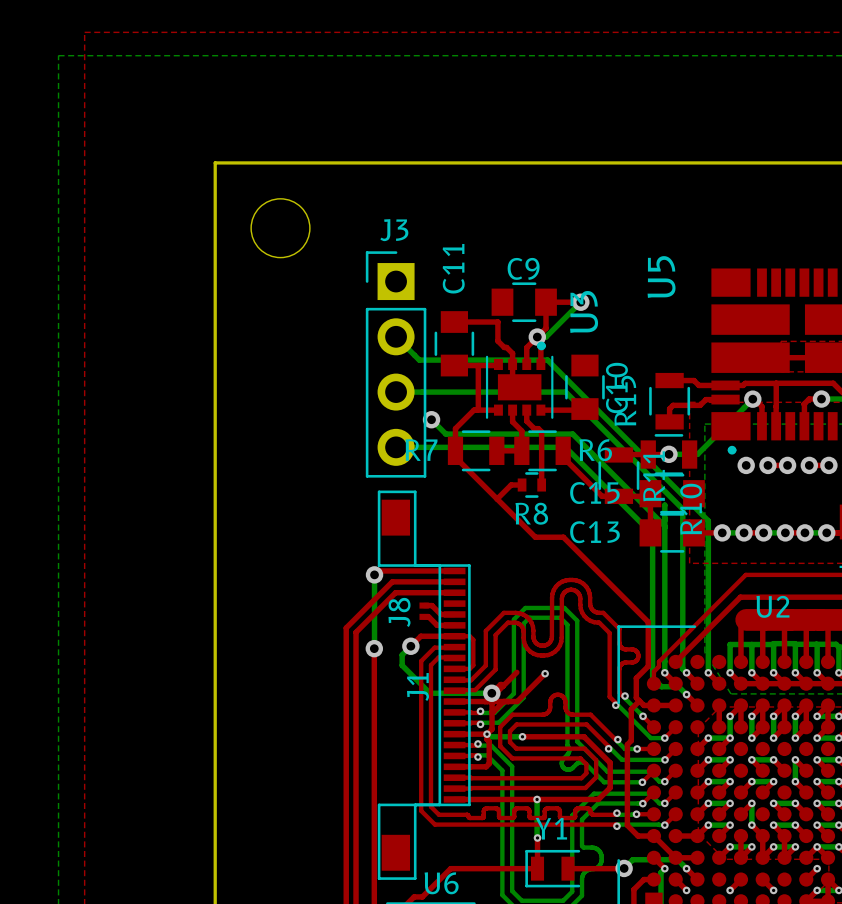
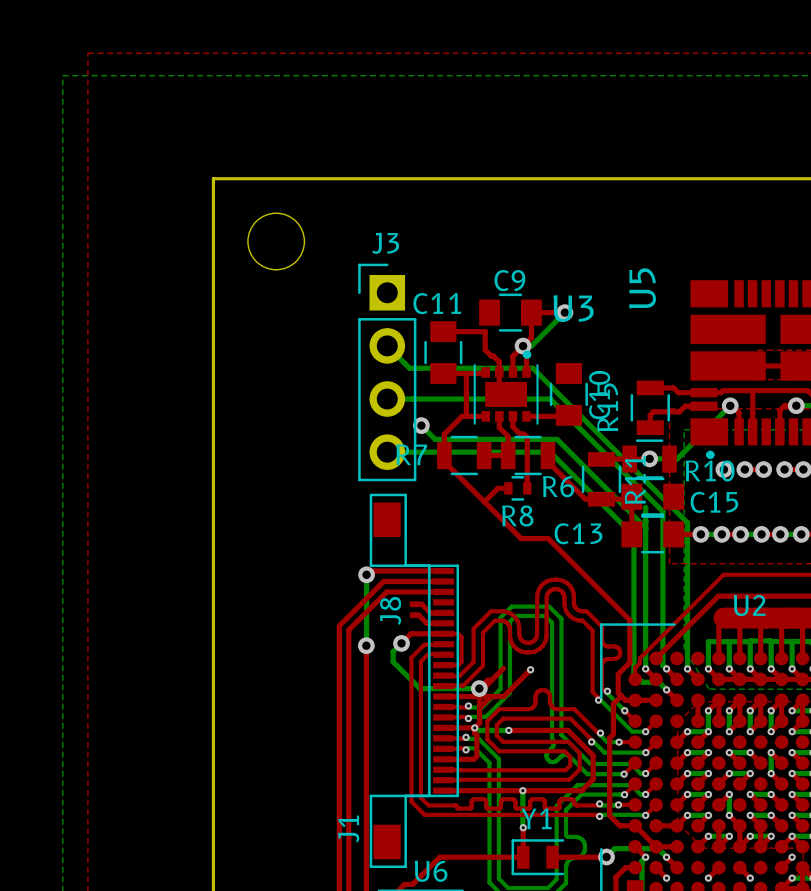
C11 name rotation: 0° (453, 268) -> 90° clockwise (437, 303)
U3 name rotation: 0° (584, 311) -> 90° clockwise (573, 308)
R6 name position: R6 (595, 450) -> R6 (558, 486)
C15 name position: C15 (594, 493) -> C15 (714, 502)
R10 name rotation: 0° (691, 509) -> 90° clockwise (710, 470)
J1 name position: J1 (418, 687) -> J1 (348, 829)

